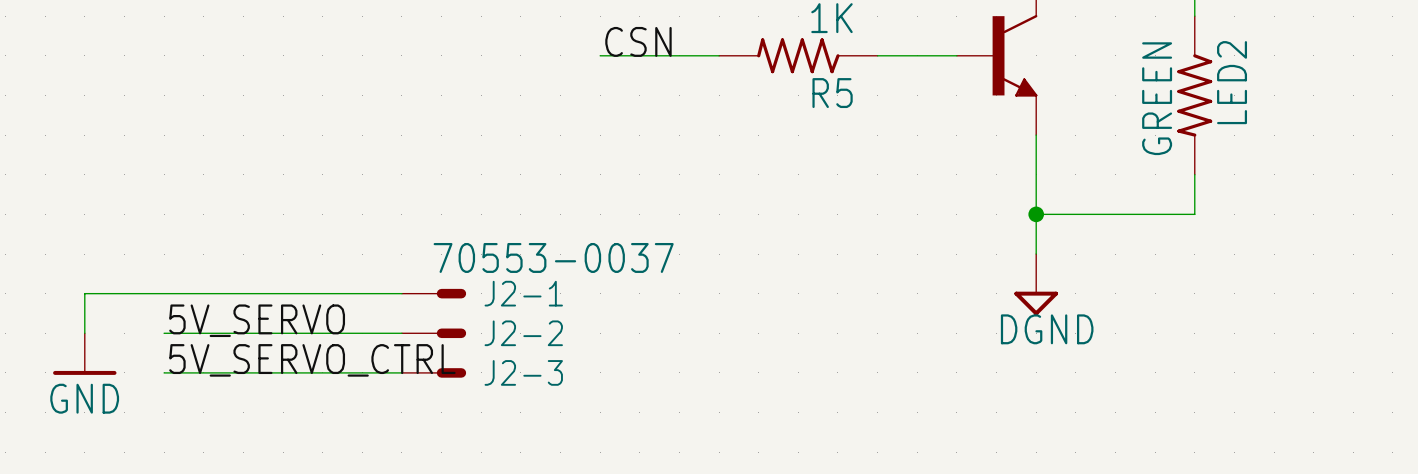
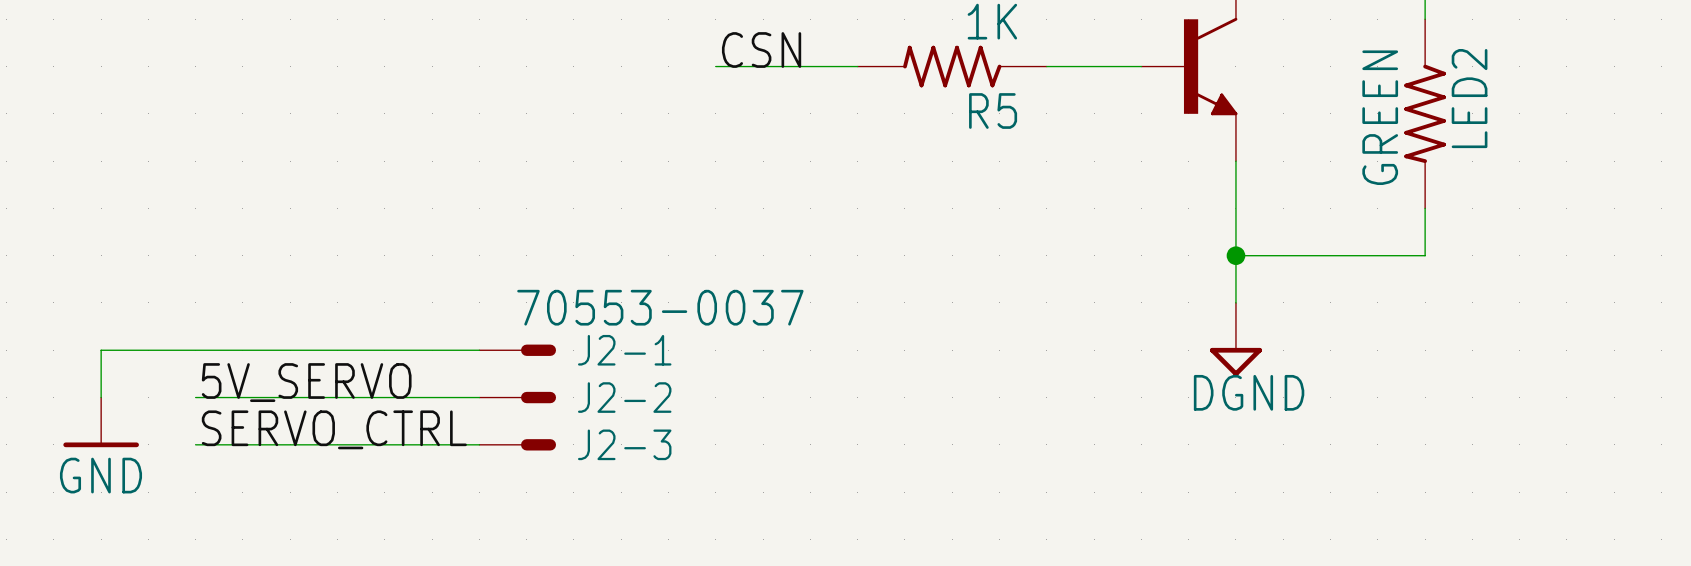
label: 5V_SERVO_CTRL (312, 360) -> SERVO_CTRL (334, 429)

